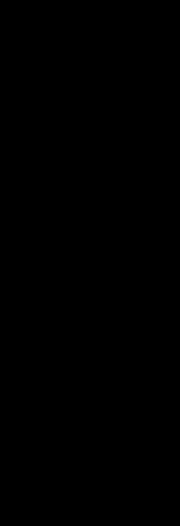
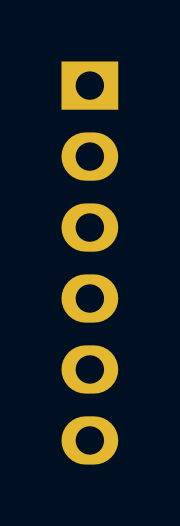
part: none -> (89, 263)

